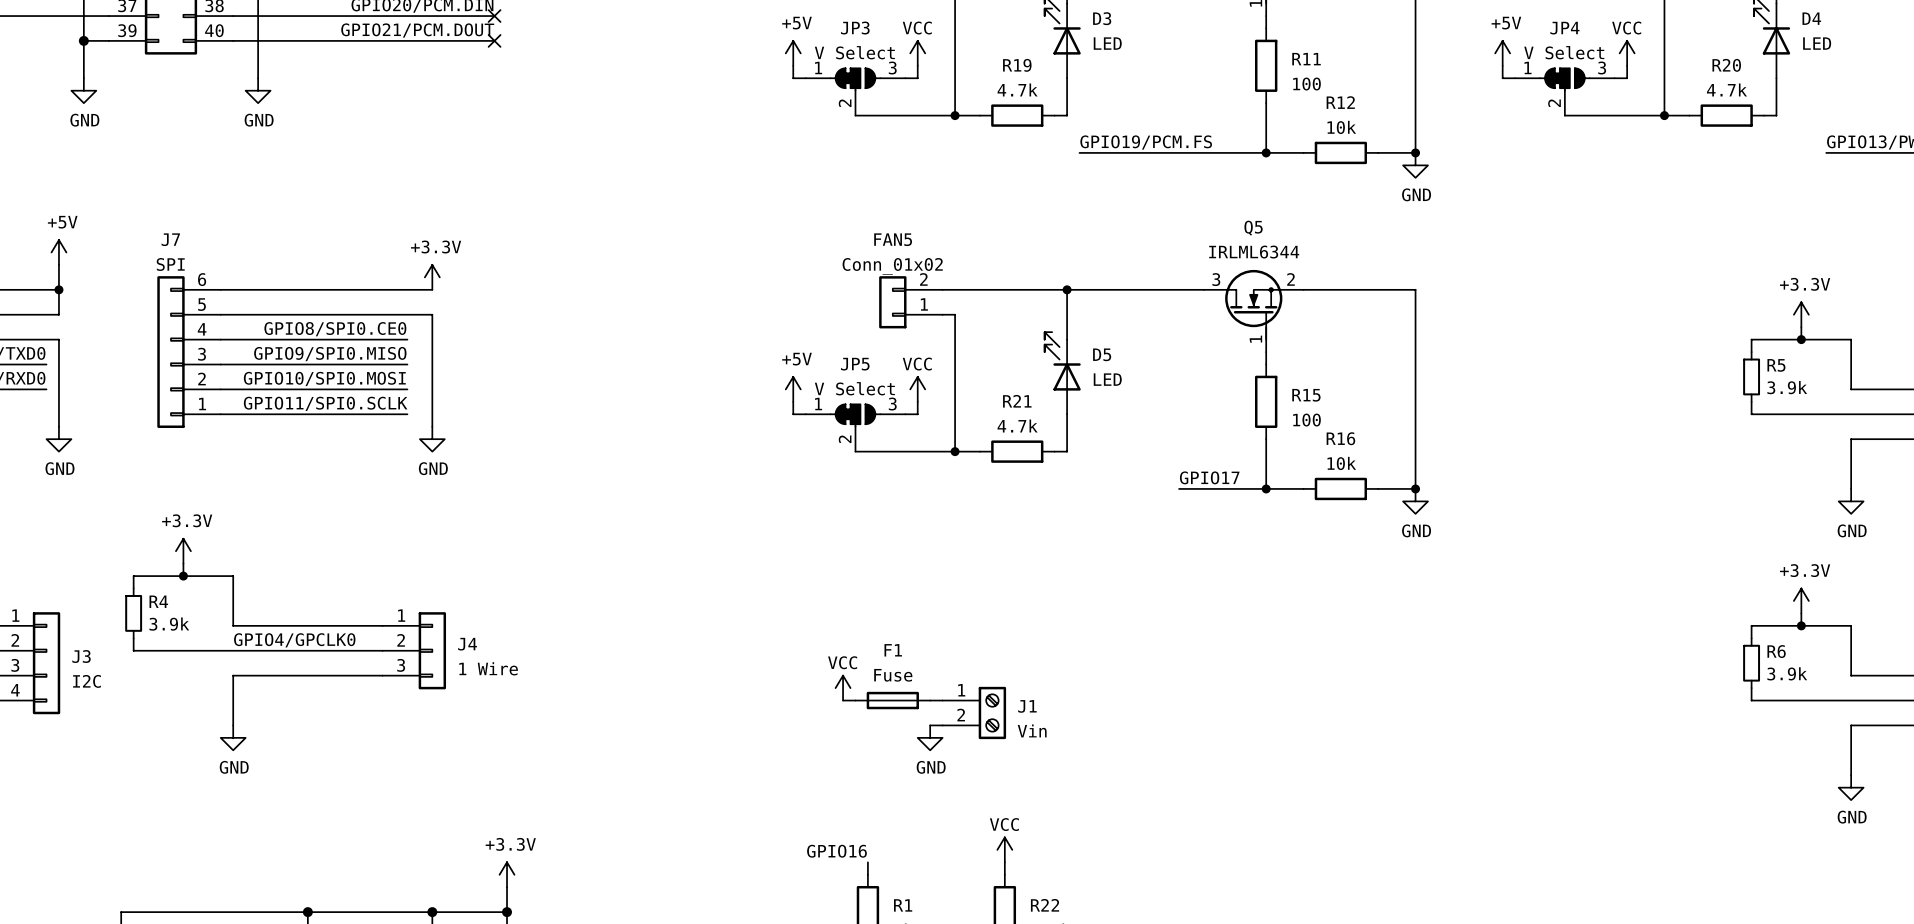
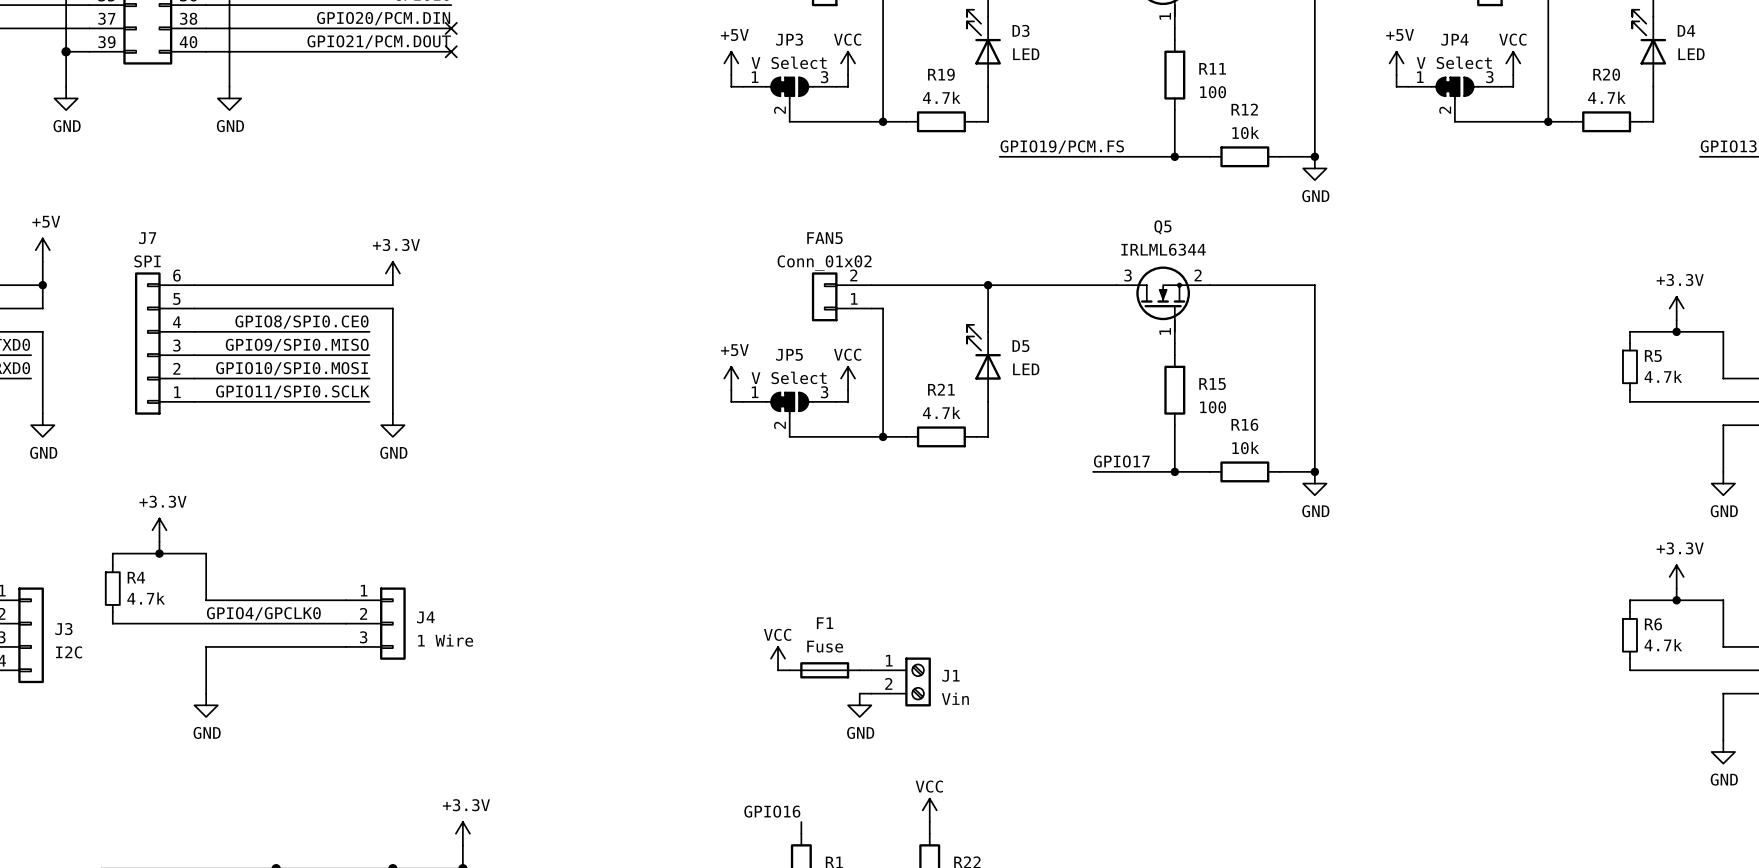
R5 value: 3.9k (1787, 387) -> 4.7k (1663, 376)
R4 value: 3.9k (169, 624) -> 4.7k (146, 598)
R6 value: 3.9k (1787, 673) -> 4.7k (1663, 645)

